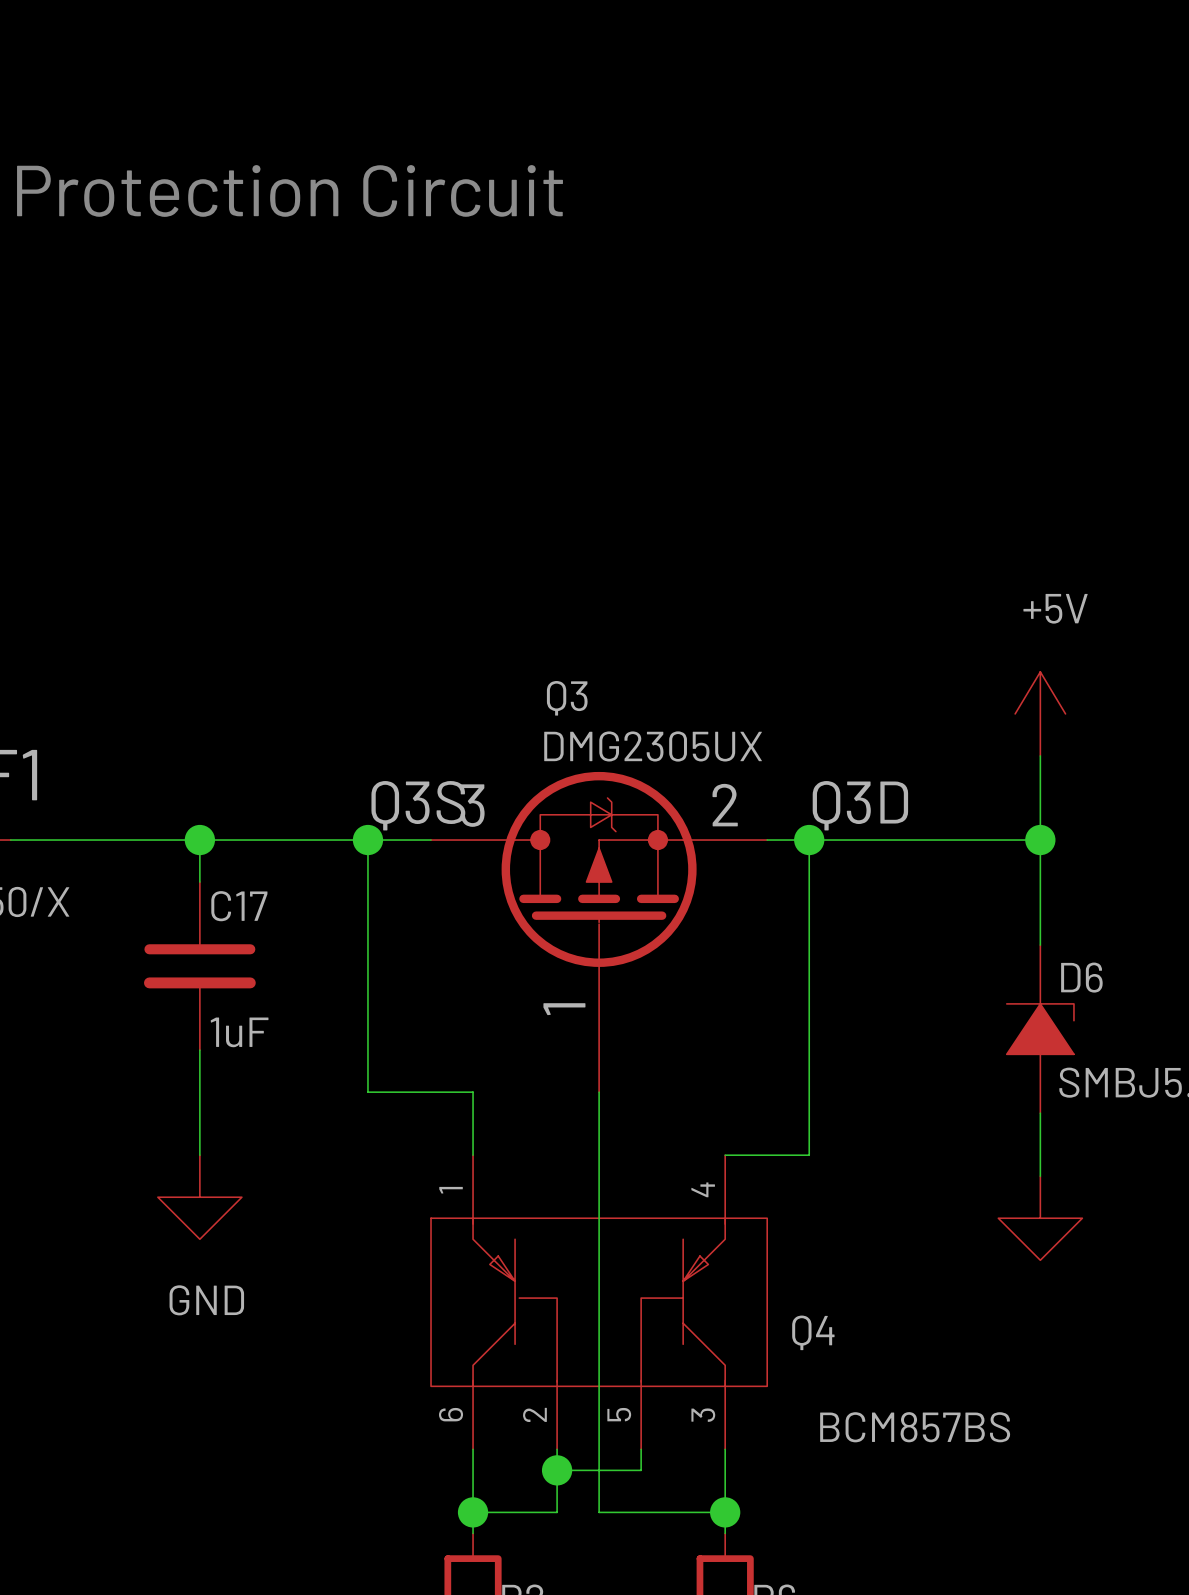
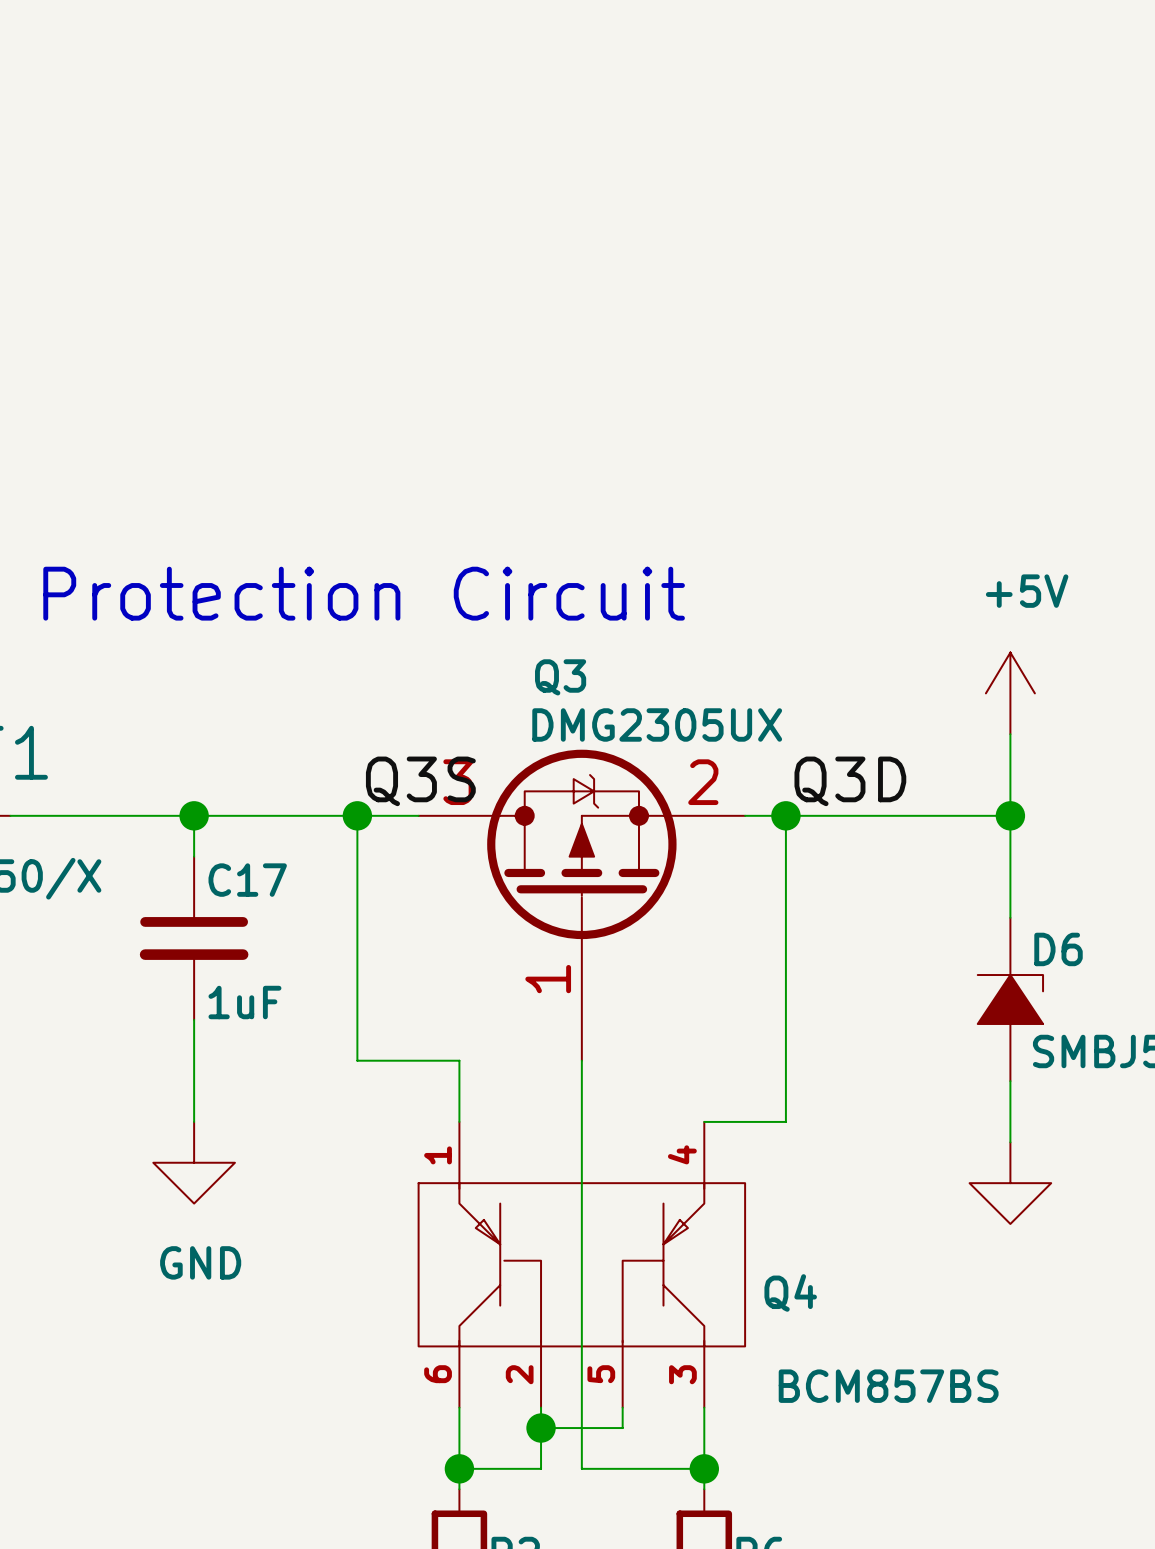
text position: Protection Circuit (290, 190) -> Protection Circuit (364, 593)

